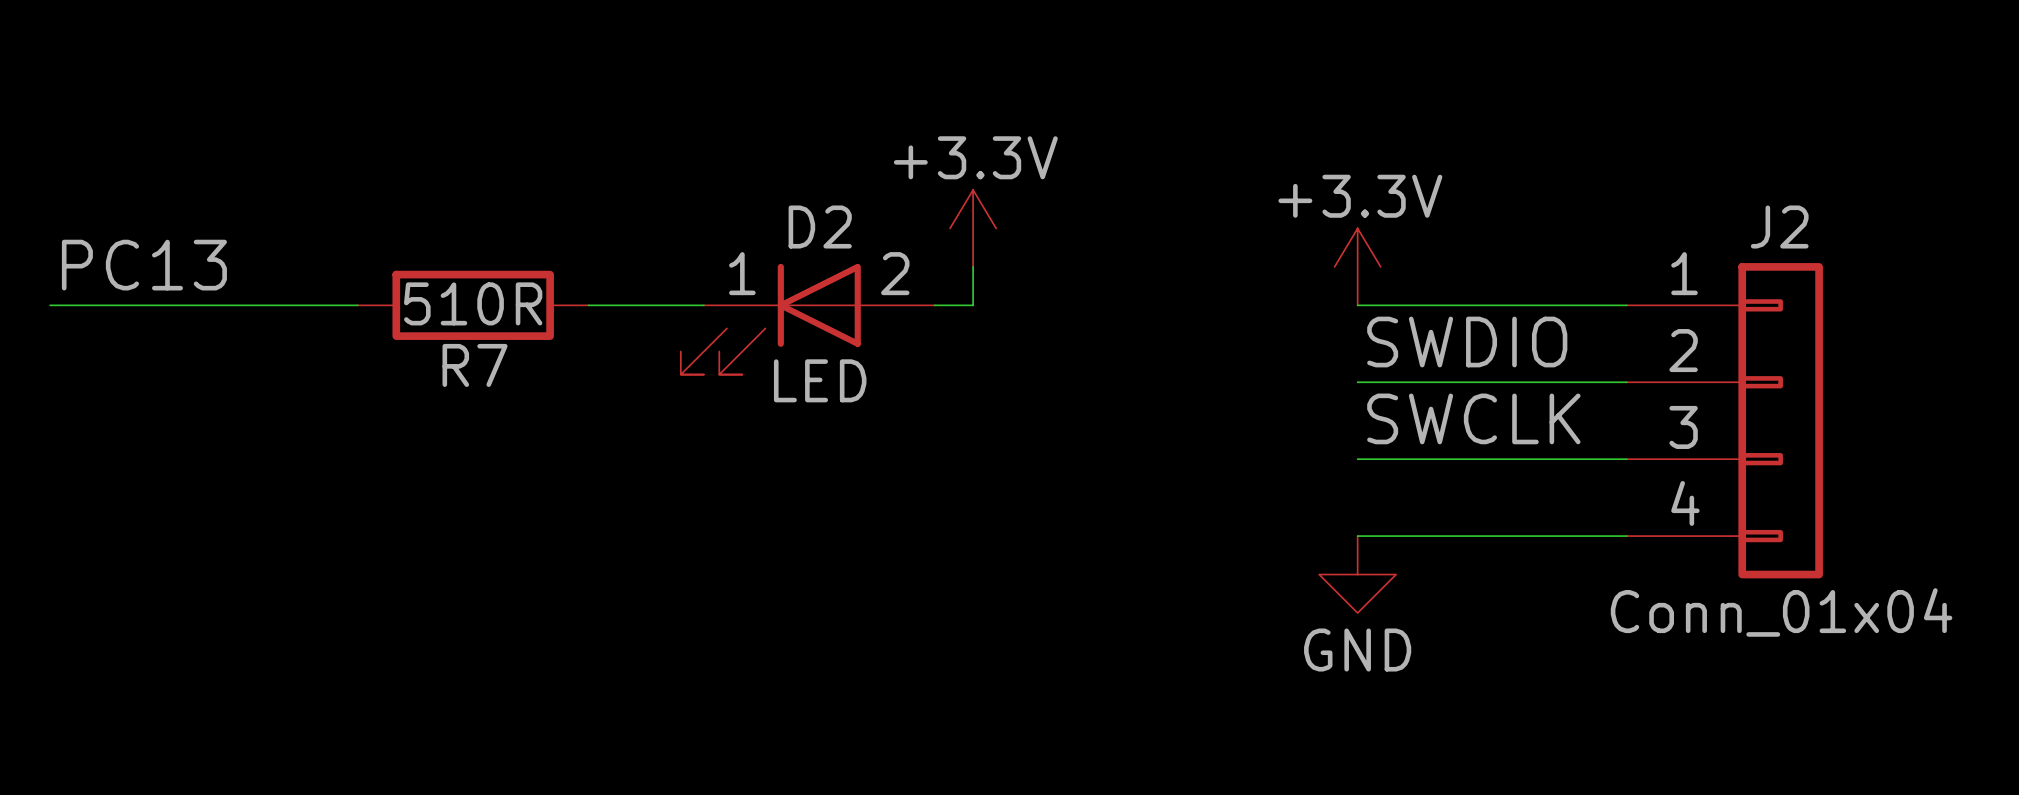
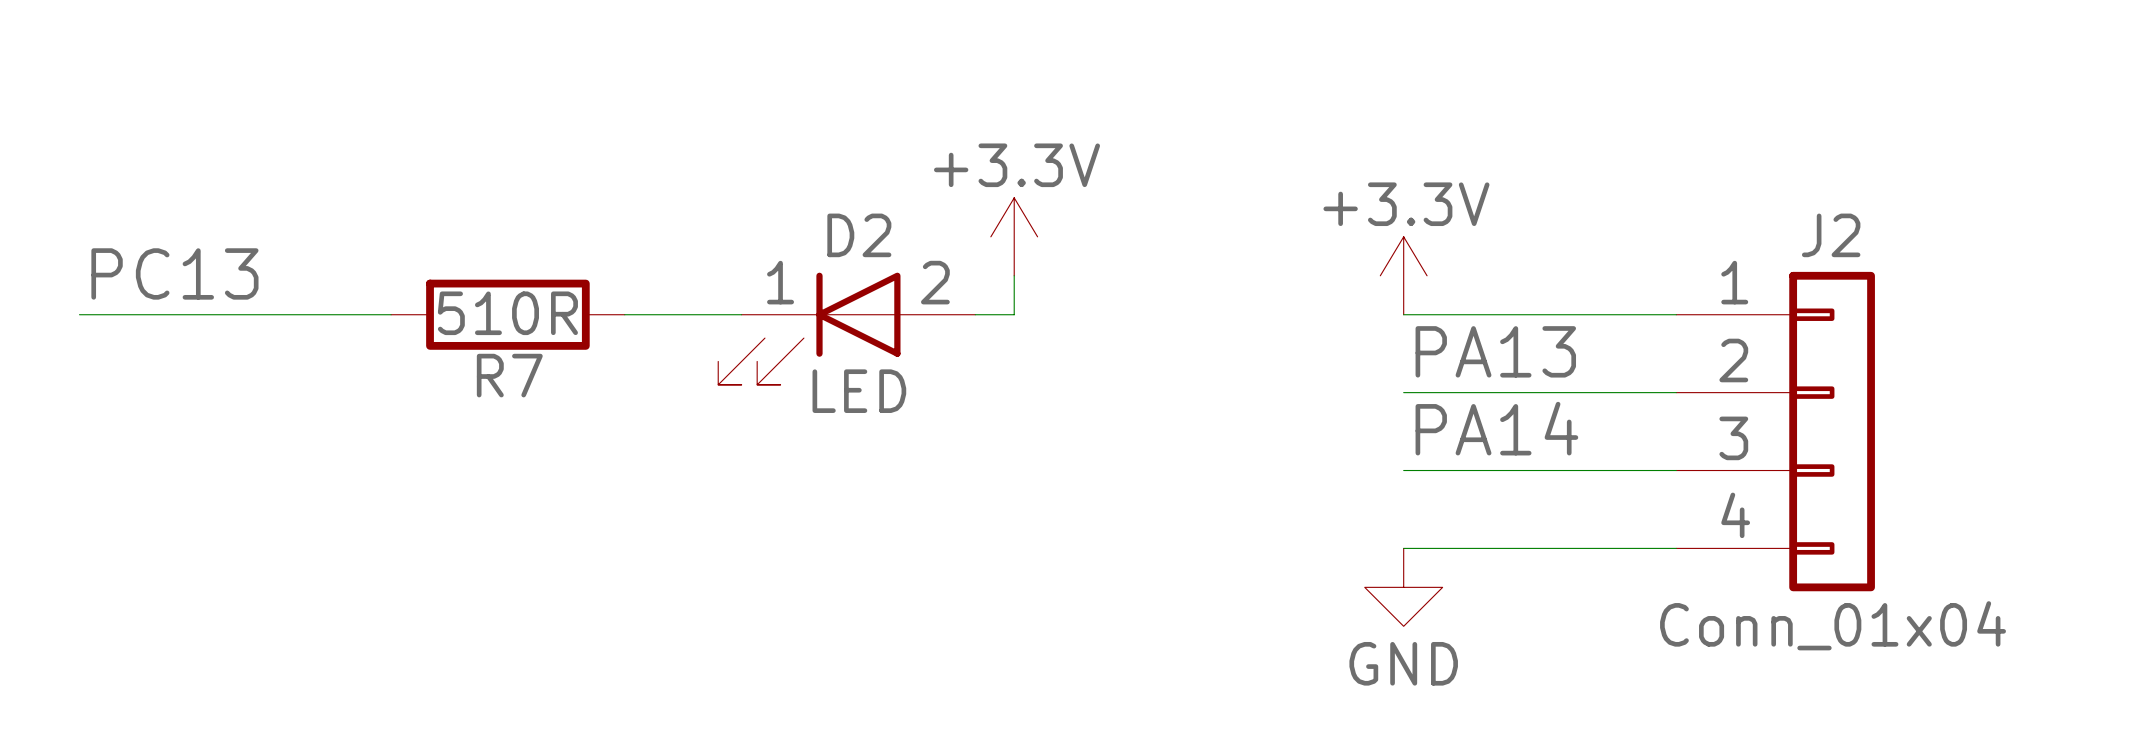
label: SWDIO (1467, 342) -> PA13 (1495, 351)
label: SWCLK (1473, 418) -> PA14 (1496, 428)

